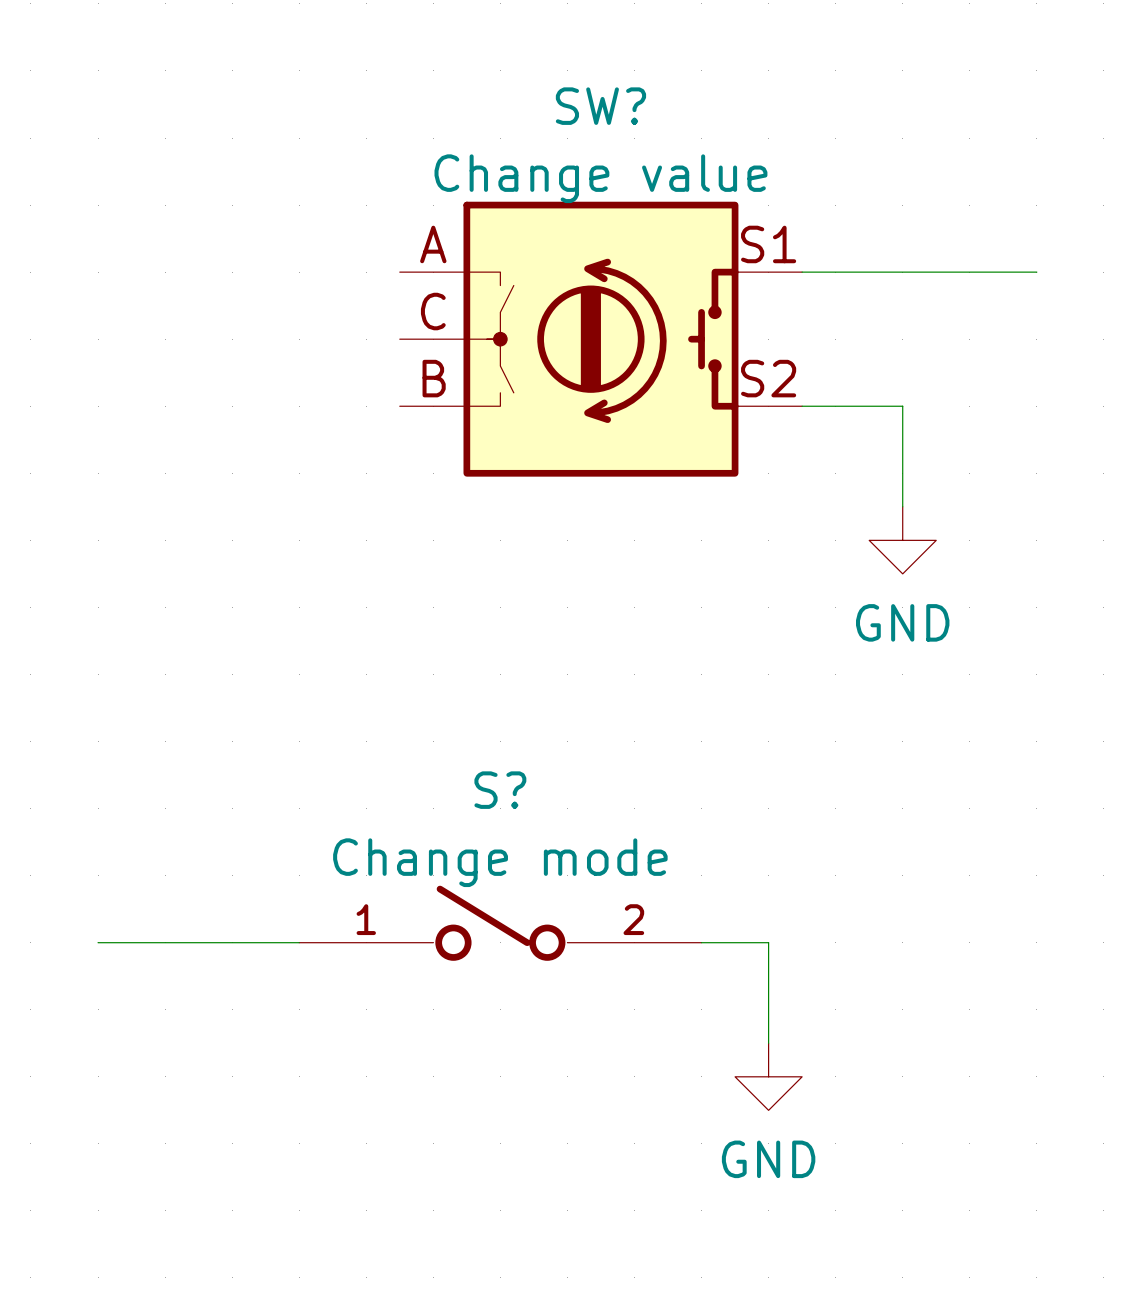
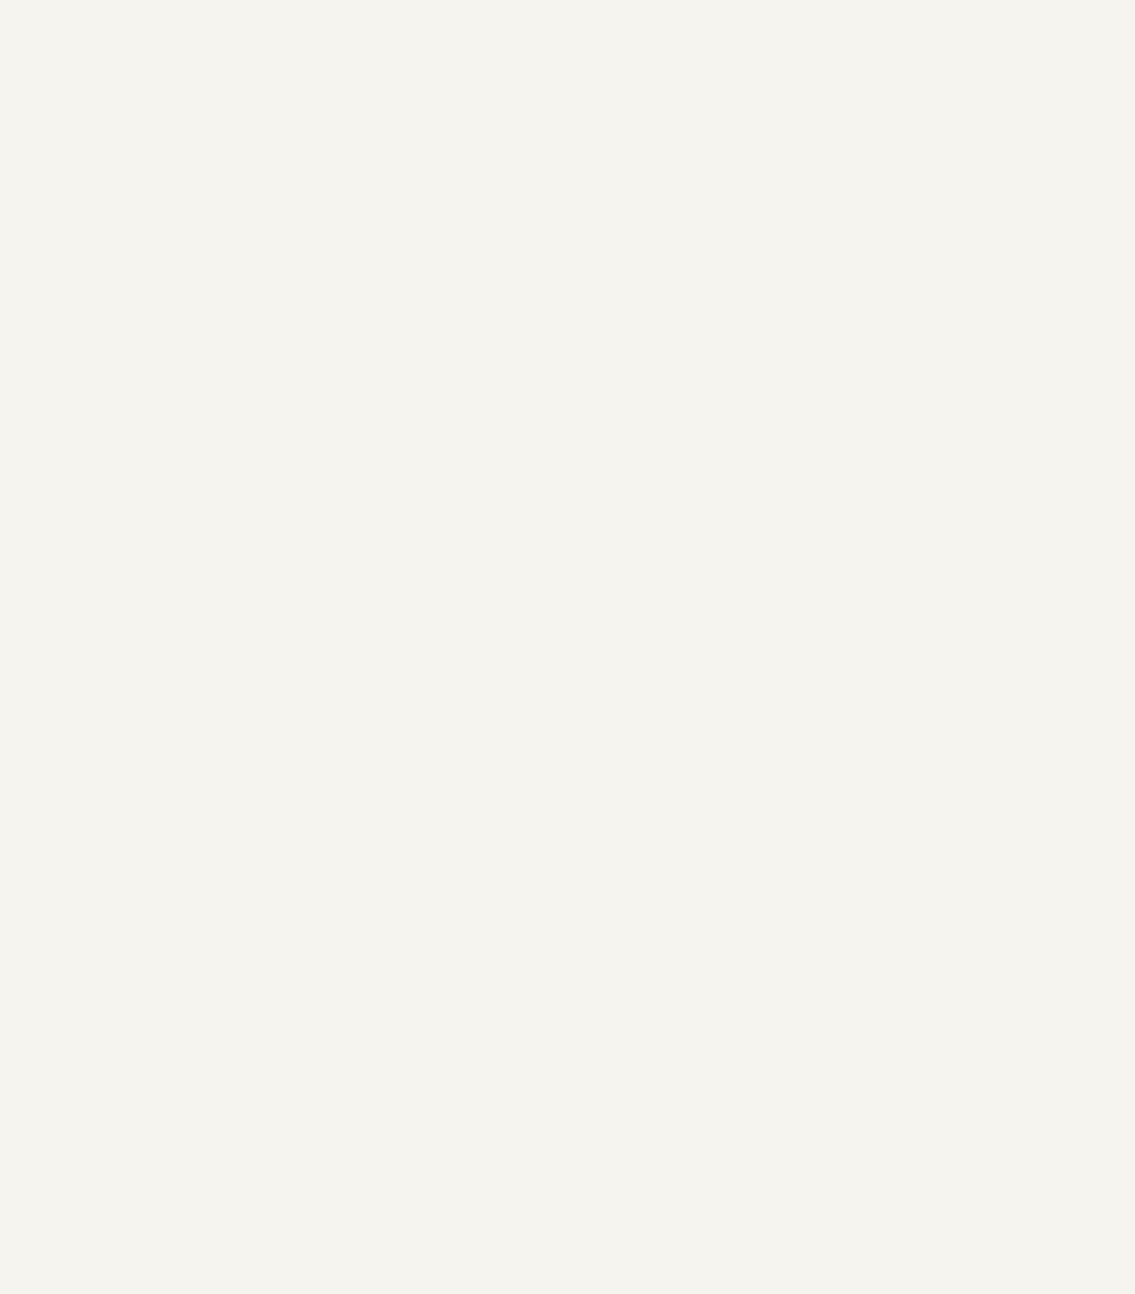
wire: (802, 272) (1036, 272) -> none
SW?: Change value (600, 339) -> none
wire: (802, 406) (902, 406) (902, 506) -> none
power symbol: GND (902, 540) -> none
S?: Change mode (500, 923) -> none
wire: (98, 942) (299, 942) -> none
wire: (701, 942) (768, 942) (768, 1043) -> none
power symbol: GND (768, 1076) -> none

